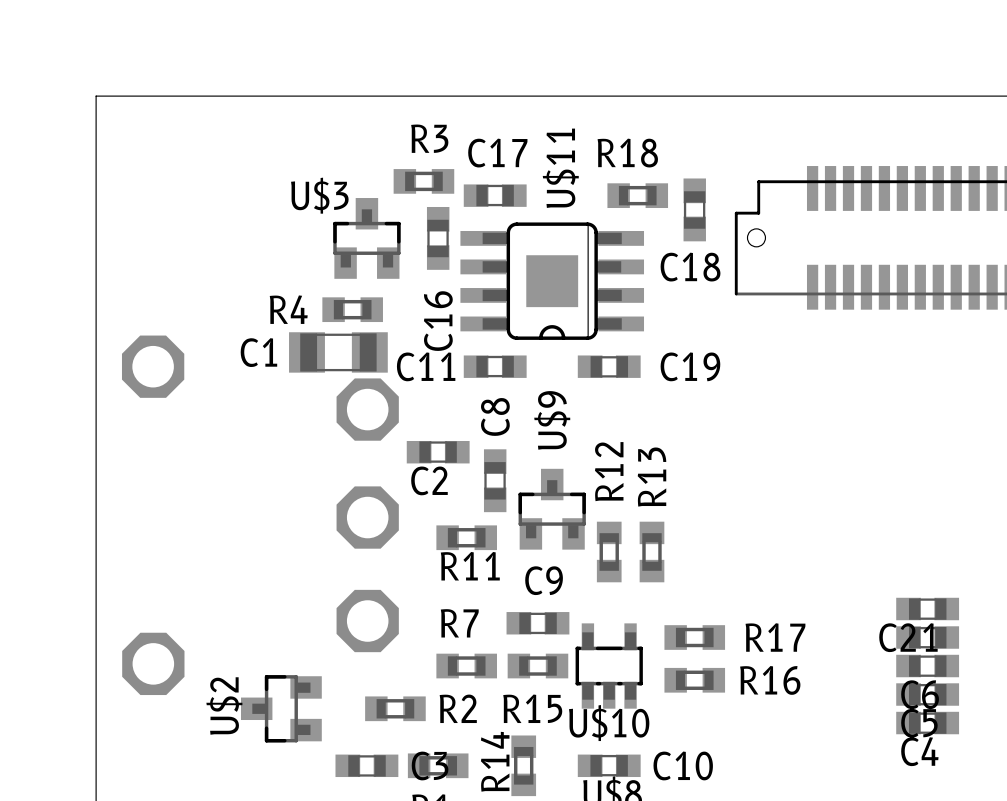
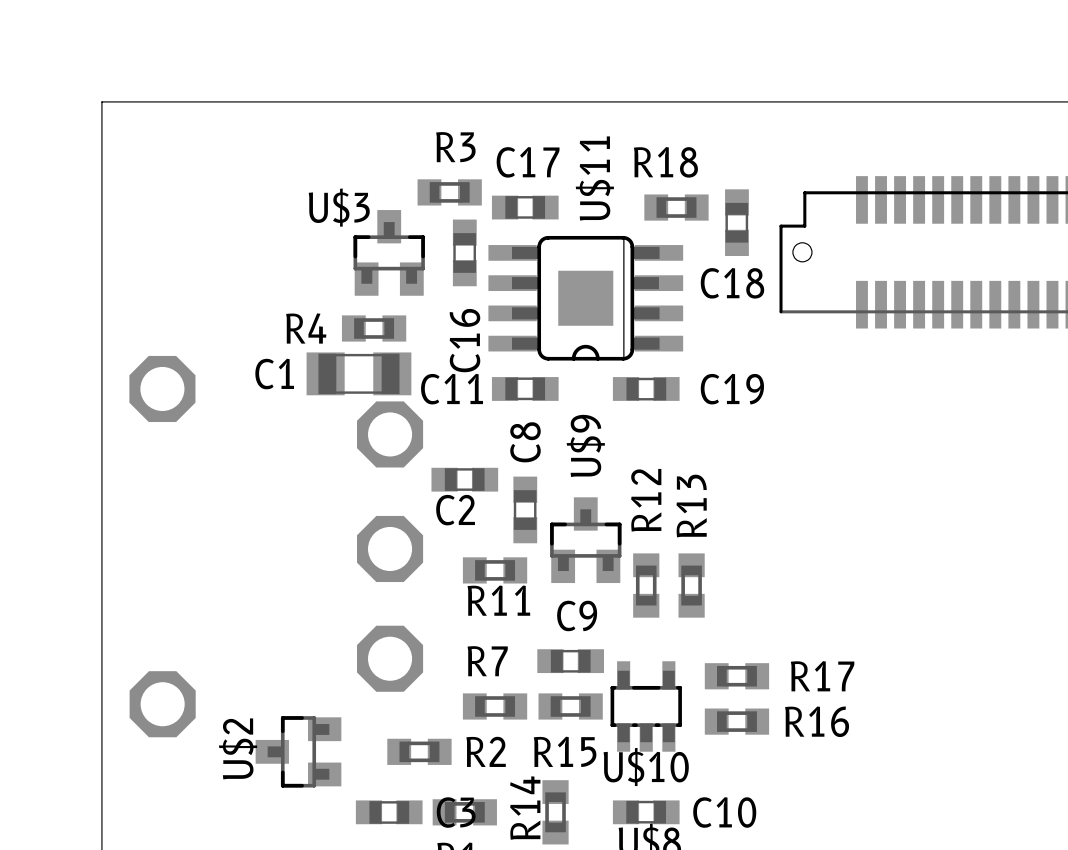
C21: (927, 609) -> none
part: (927, 637) -> none
C6: (927, 666) -> none
C5: (927, 694) -> none
C4: (927, 723) -> none

